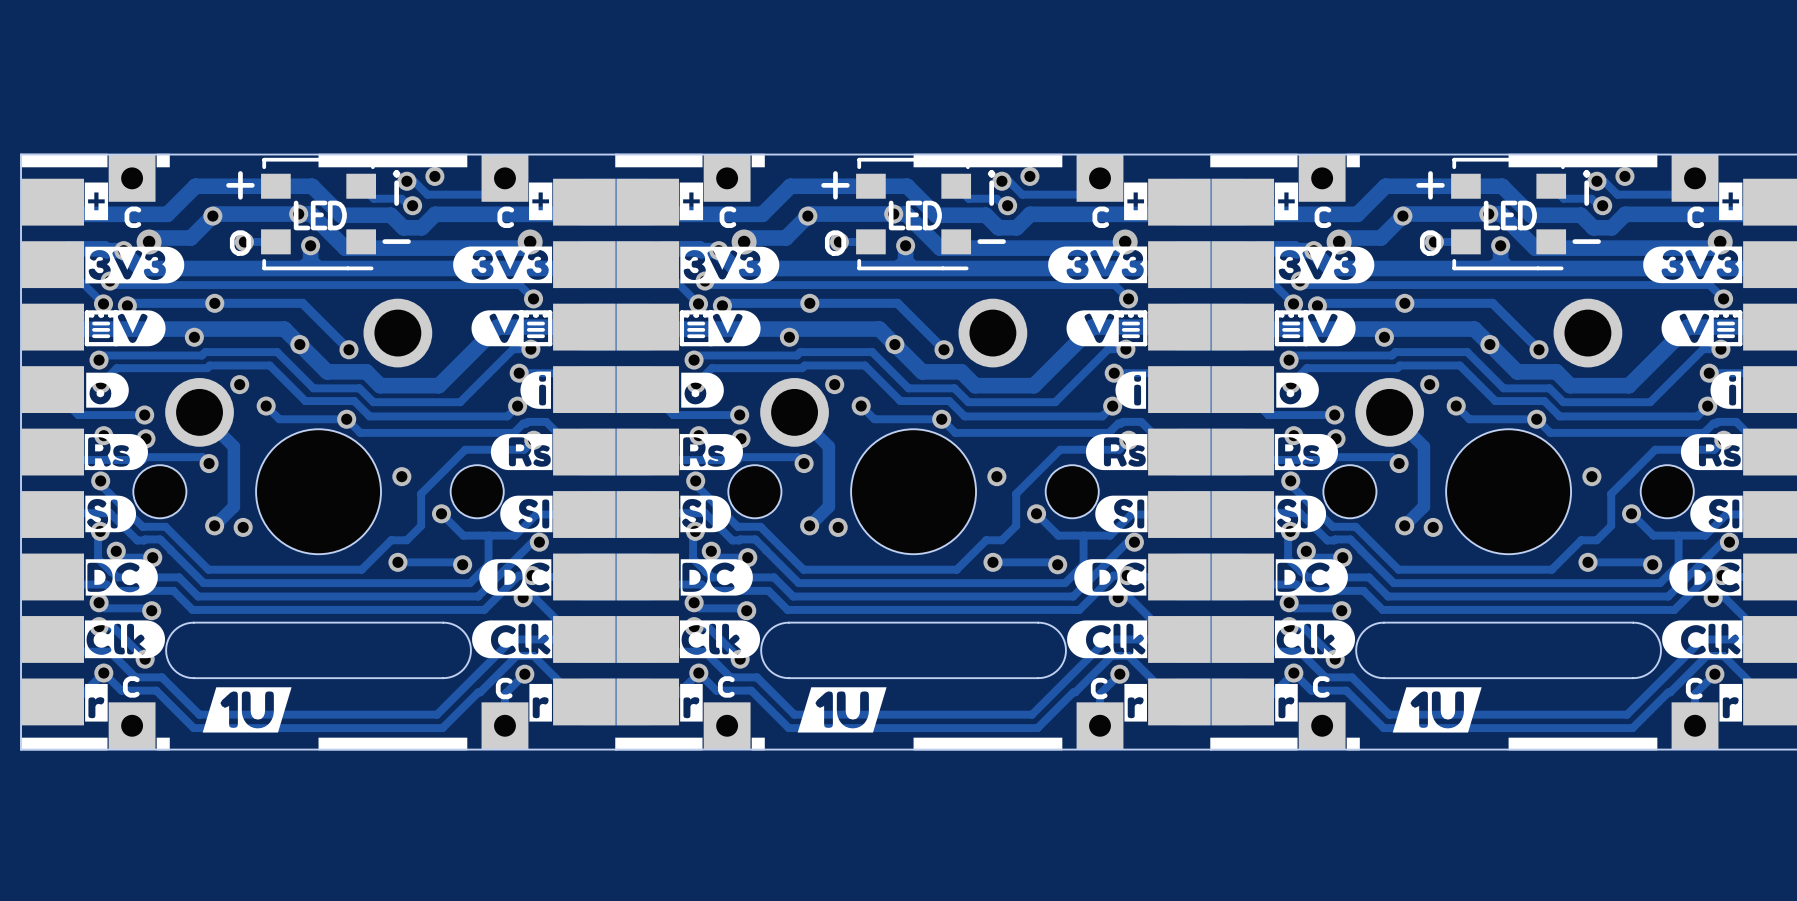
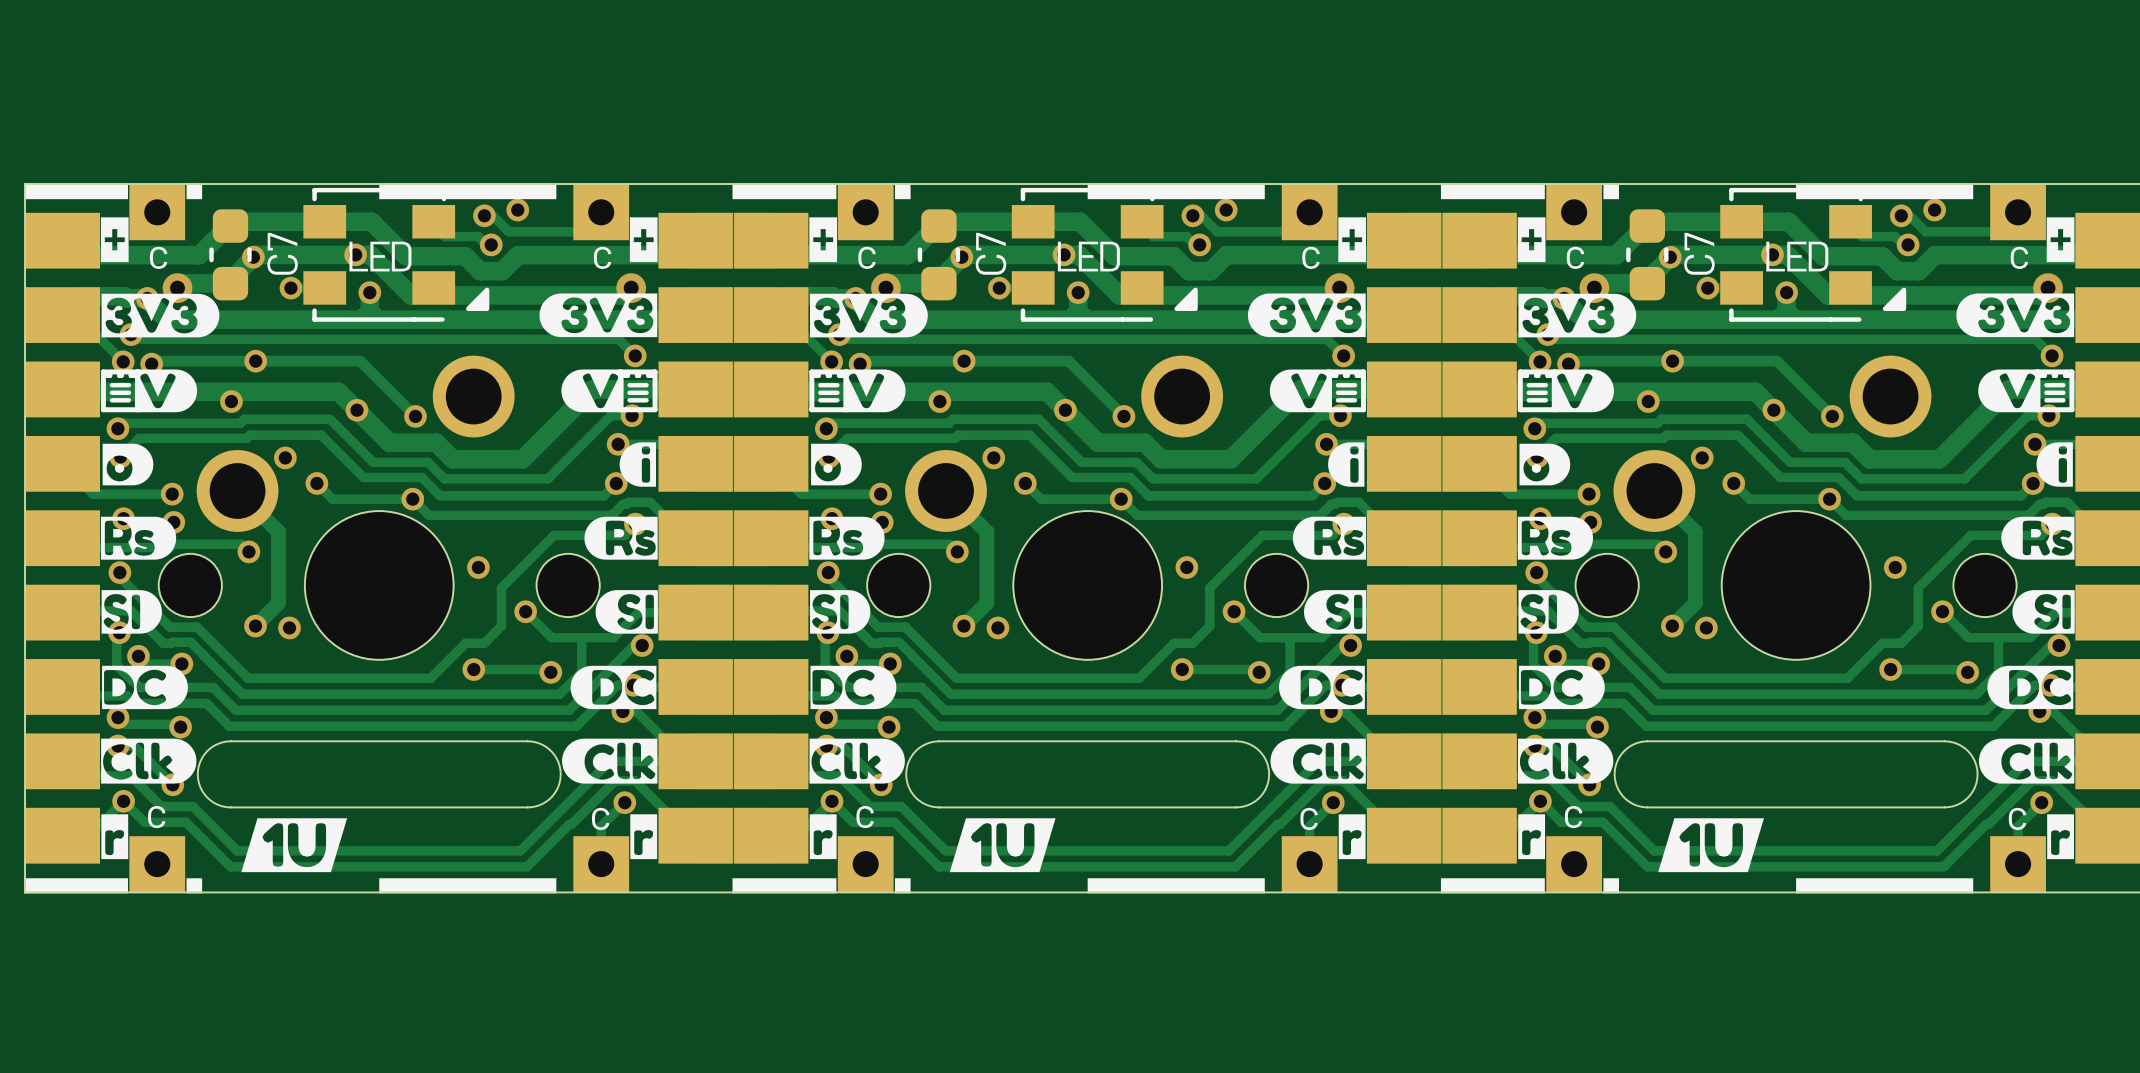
part footprint: [261, 157, 377, 271] -> [303, 187, 490, 322]
part footprint: [856, 157, 972, 271] -> [1011, 187, 1198, 322]
part footprint: [1451, 157, 1567, 271] -> [1720, 187, 1907, 322]
C7: none -> (230, 254)
C7: none -> (938, 254)
C7: none -> (1647, 254)

